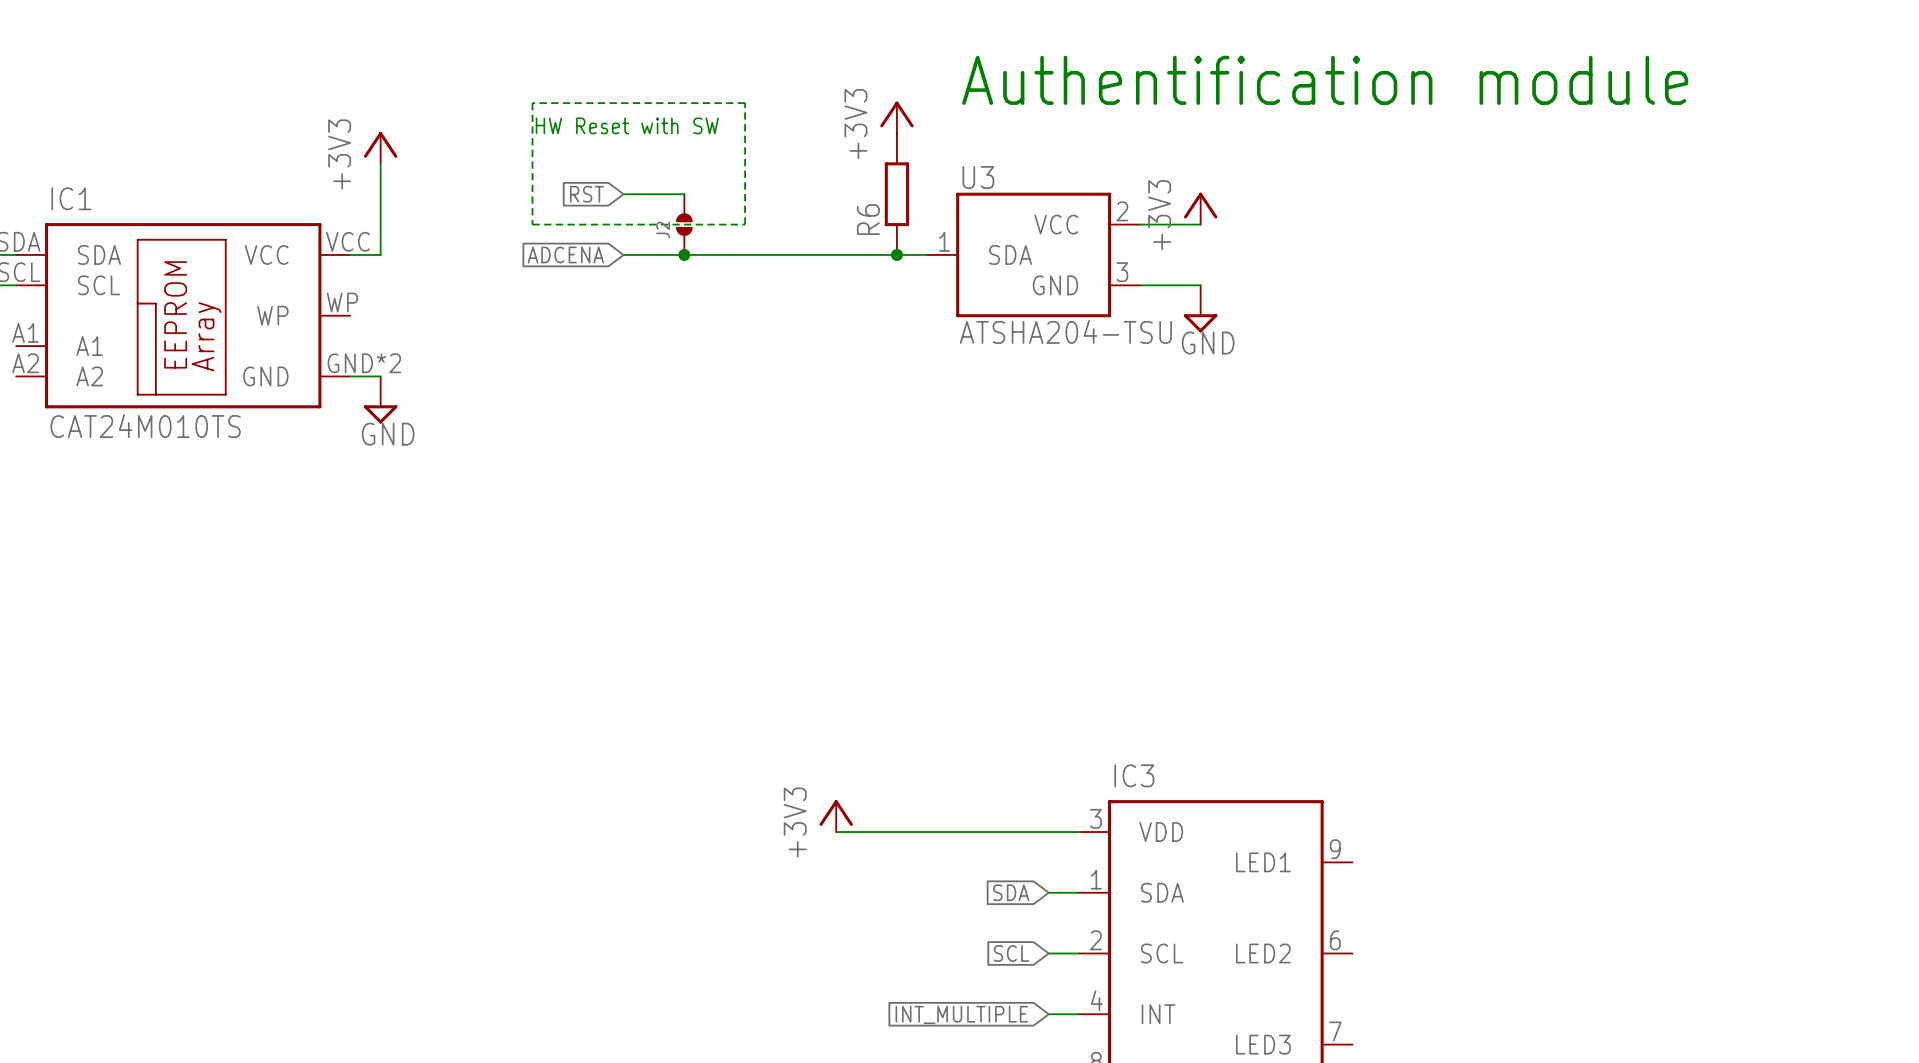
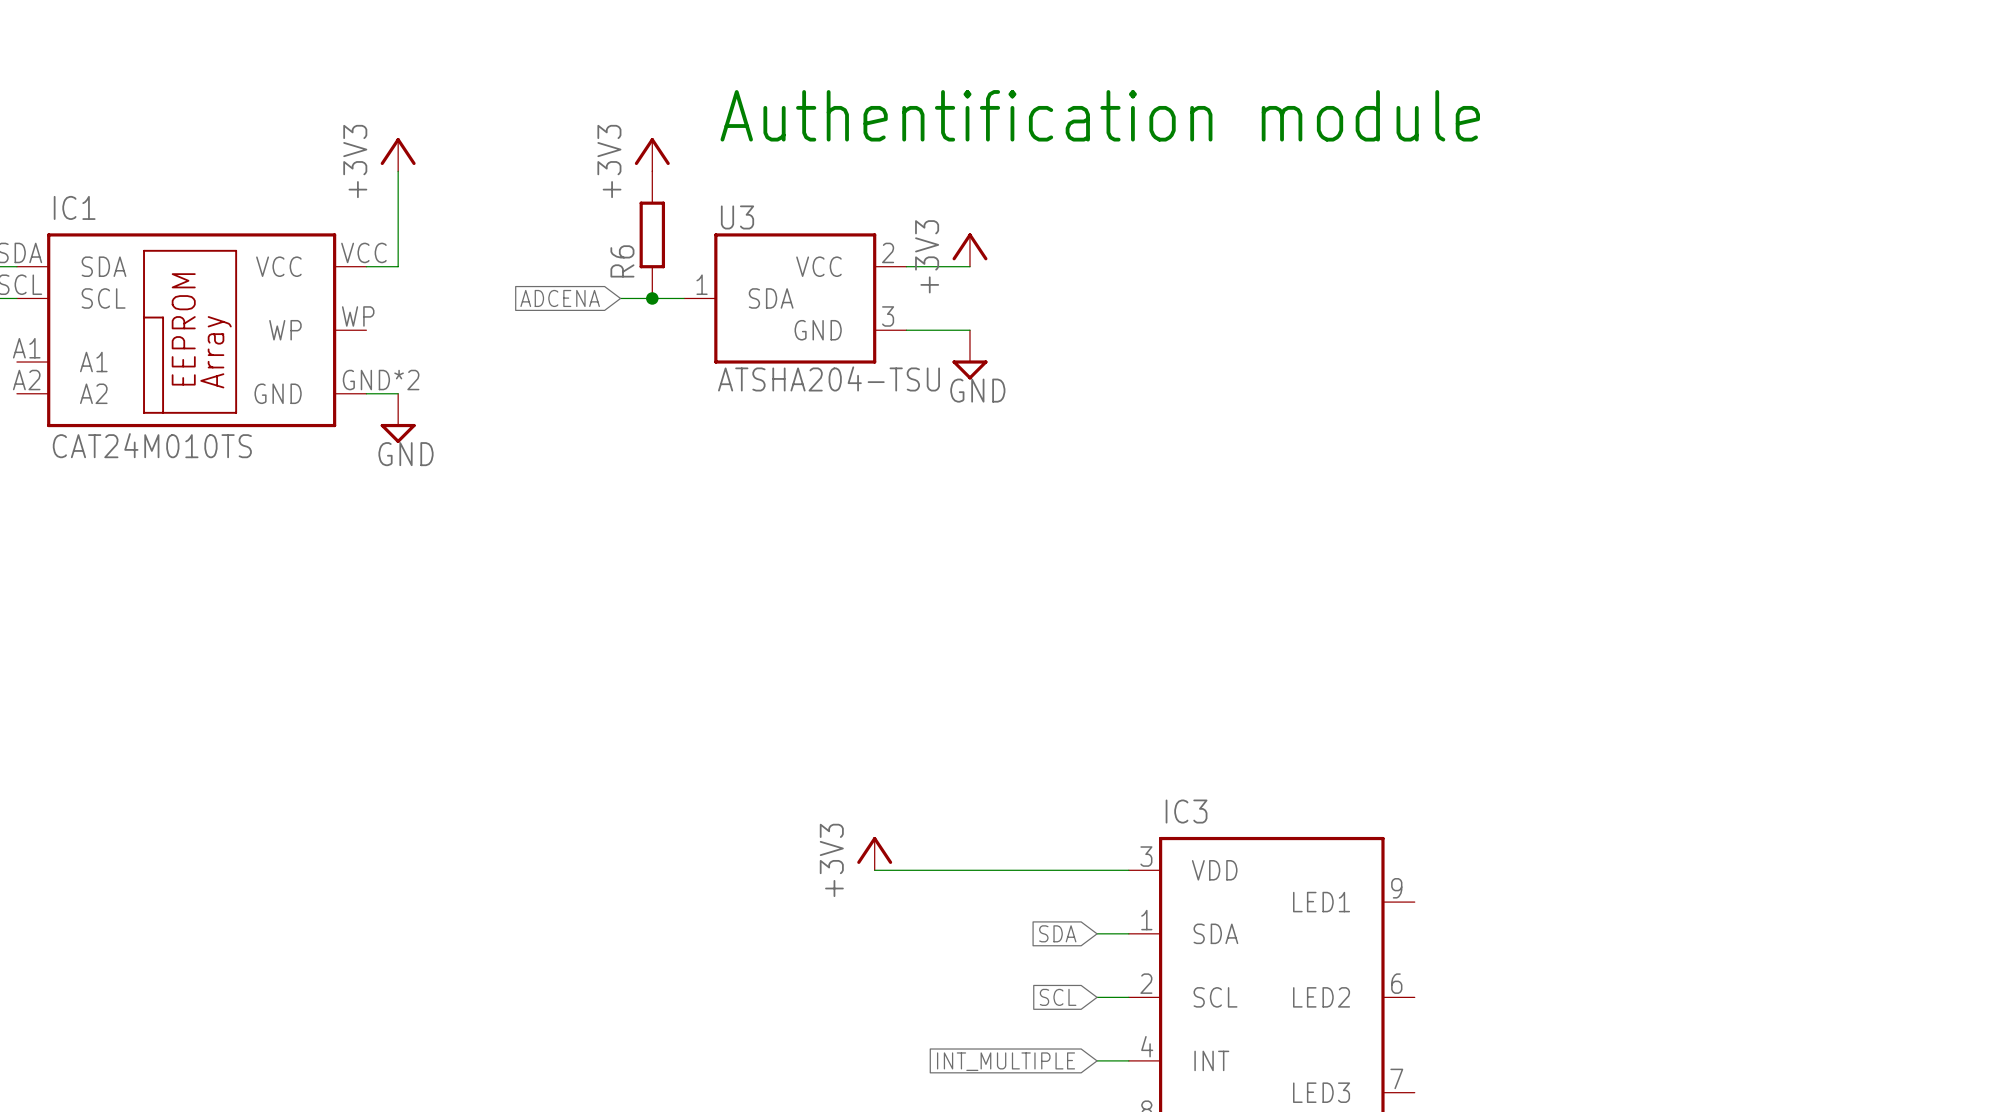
text position: Authentification module (1325, 80) -> Authentification module (1100, 115)
wire: (532, 103) (745, 103) (745, 224) (532, 224) (532, 103) -> none
power symbol position: +3V3 (896, 117) -> +3V3 (969, 250)
text: HW Reset with SW (627, 125) -> none
power symbol: none -> +3V3 (652, 154)
global label: RST (587, 194) -> none
wire: (623, 194) (684, 194) -> (620, 298) (684, 298)
R6 position: (896, 194) -> (652, 234)
power symbol: +3V3 (1200, 208) -> none
J2: (684, 224) -> none
wire: (1139, 224) (1200, 224) -> none
global label position: ADCENA (565, 254) -> ADCENA (560, 298)
wire: (623, 254) (866, 254) -> none
junction position: (684, 254) -> (652, 298)
junction: (896, 254) -> none
U3 position: (1033, 254) -> (795, 298)
wire: (1139, 285) (1200, 285) -> (906, 330) (969, 330)
power symbol position: GND (1200, 308) -> GND (969, 354)

